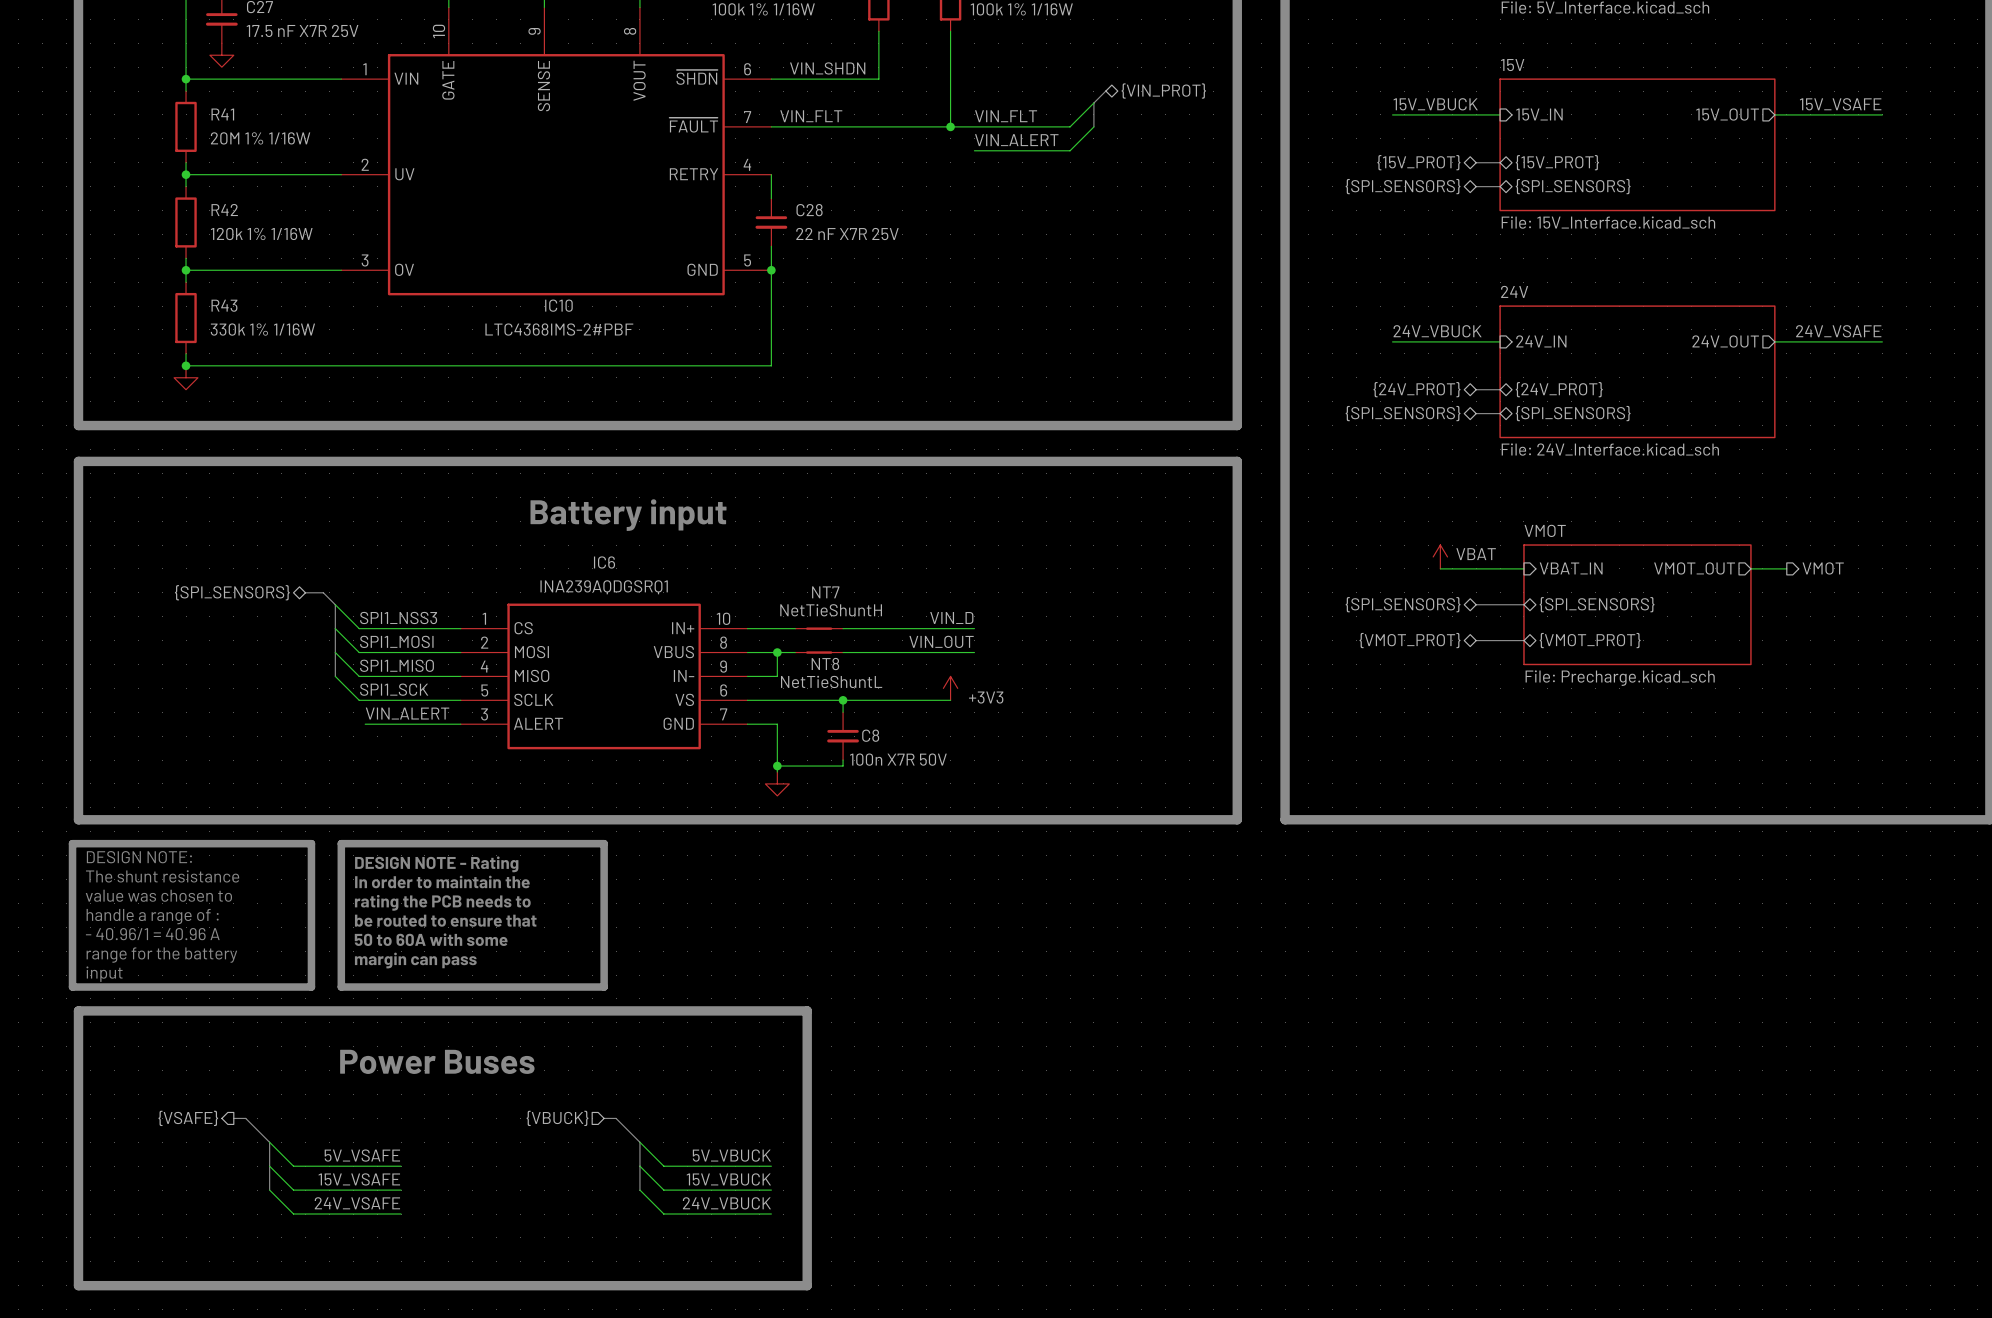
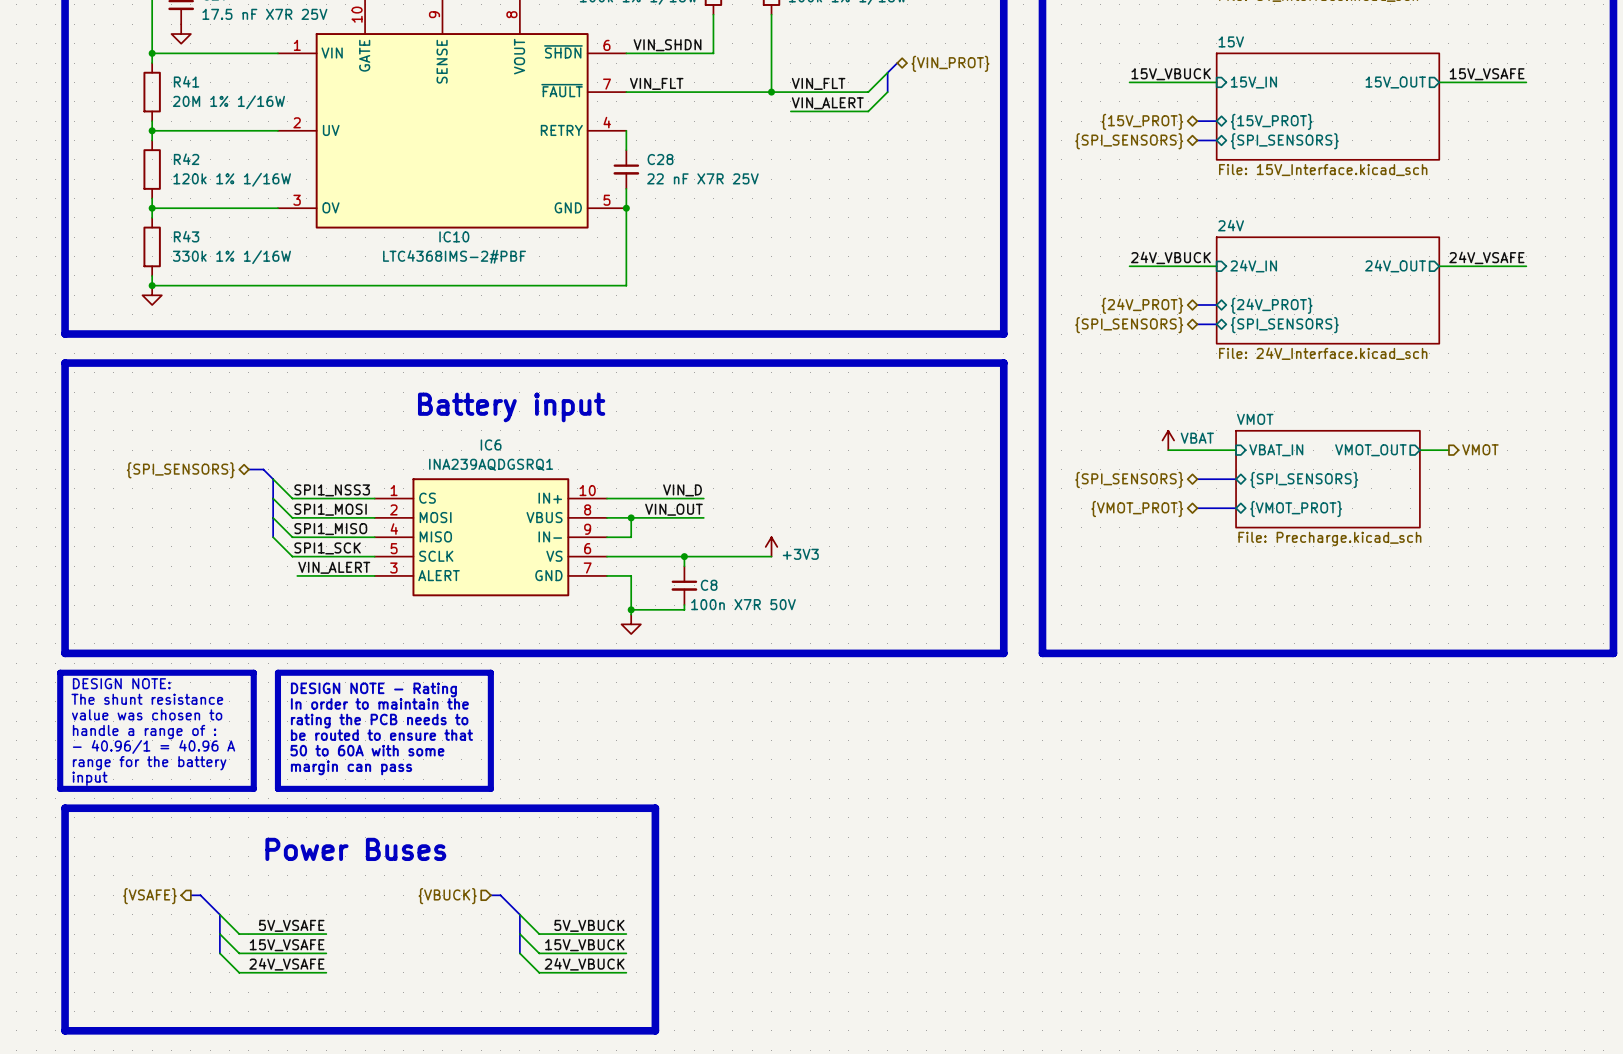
label position: VIN_D (951, 617) -> VIN_D (682, 490)
NT7: NetTieShuntH (819, 628) -> none
wire: (866, 628) (974, 628) -> none
label position: VIN_OUT (941, 641) -> VIN_OUT (673, 509)
NT8: NetTieShuntL (819, 652) -> none
wire: (866, 652) (974, 652) -> none

